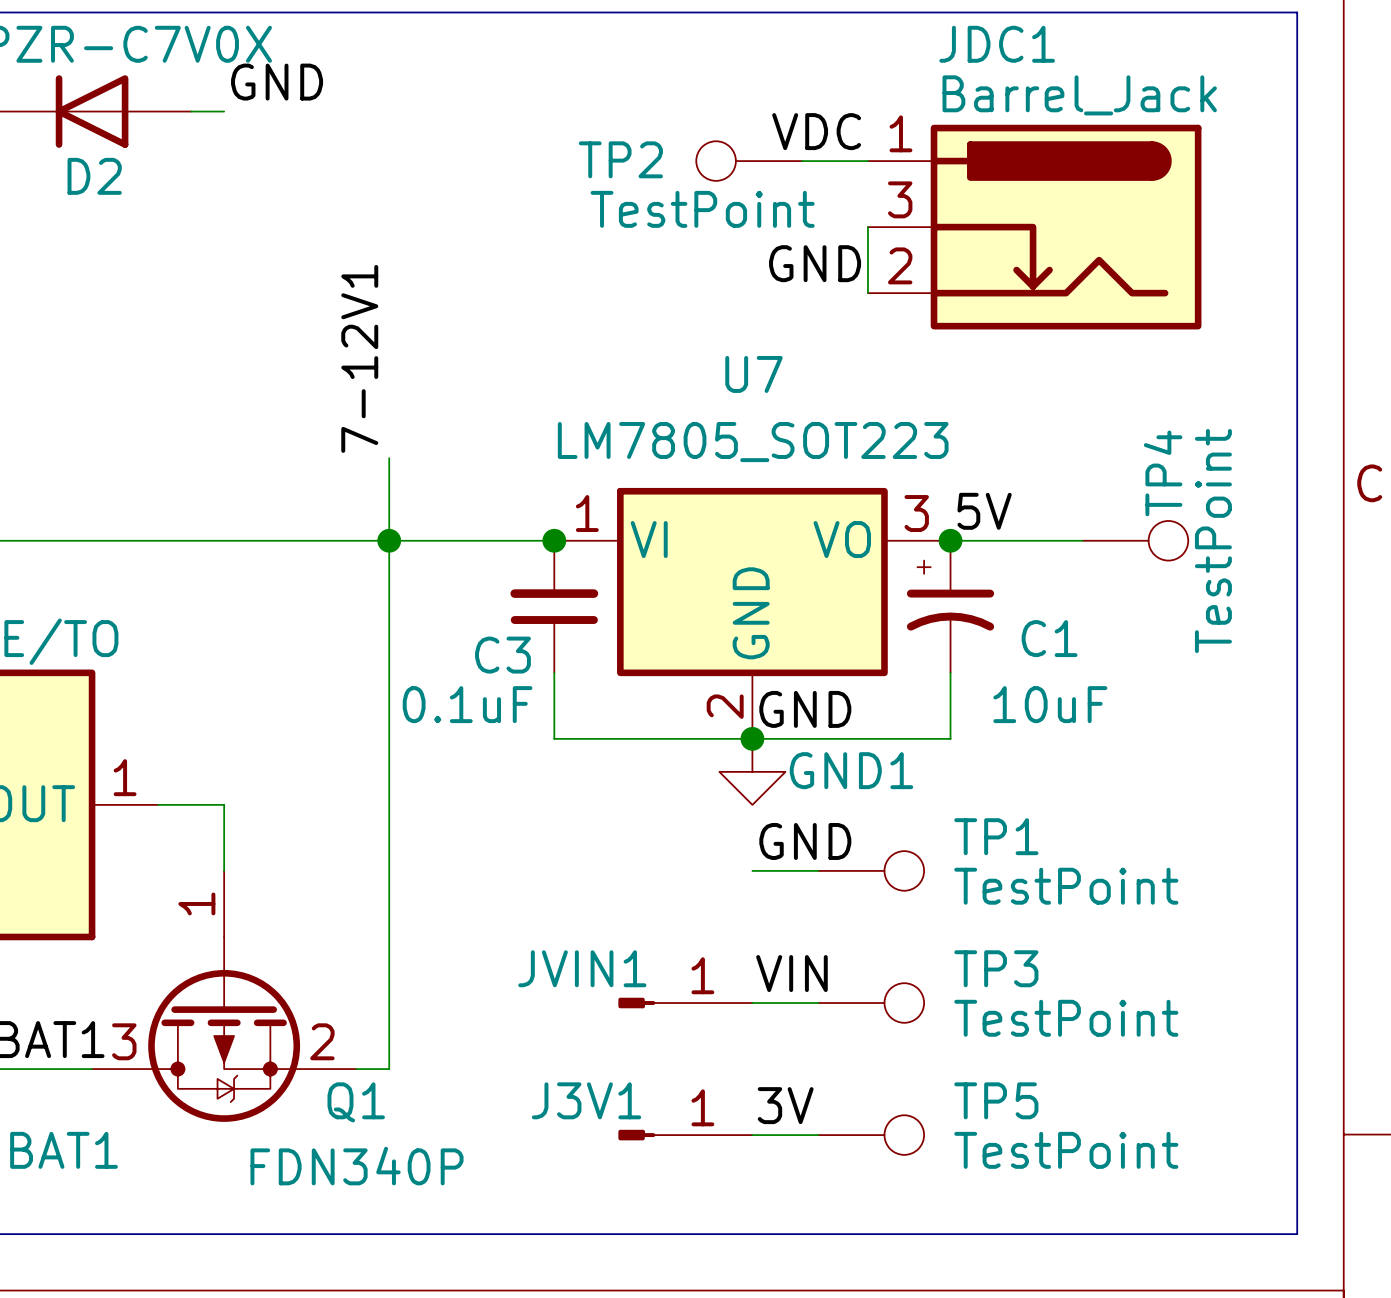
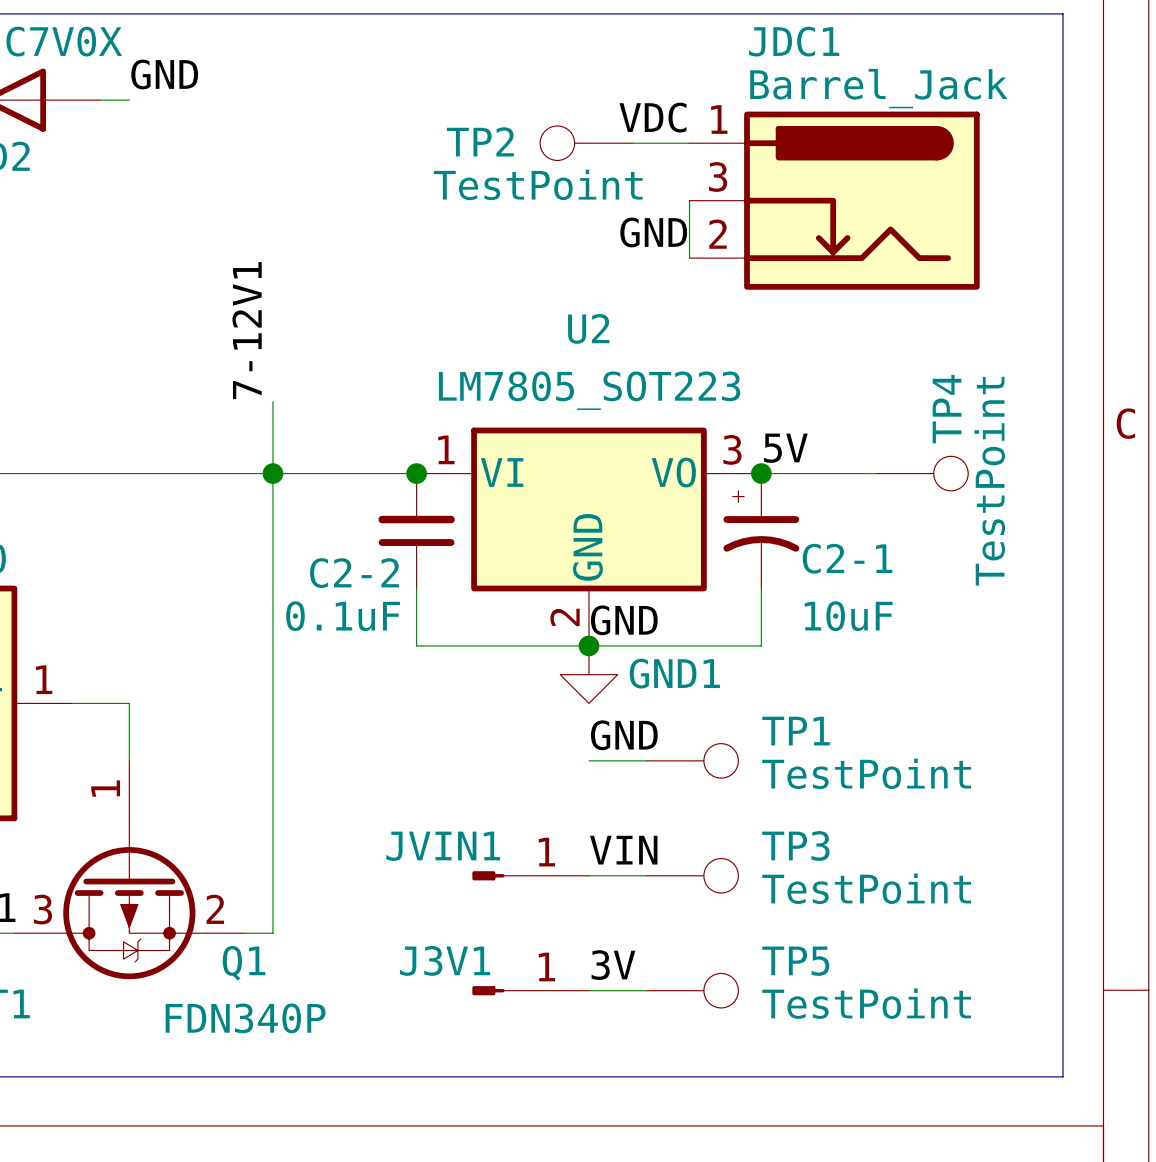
U7 name: U7 (753, 374) -> U2 (588, 328)
C1 name: C1 (1049, 638) -> C2-1 (847, 558)
C3 name: C3 (502, 655) -> C2-2 (354, 573)

